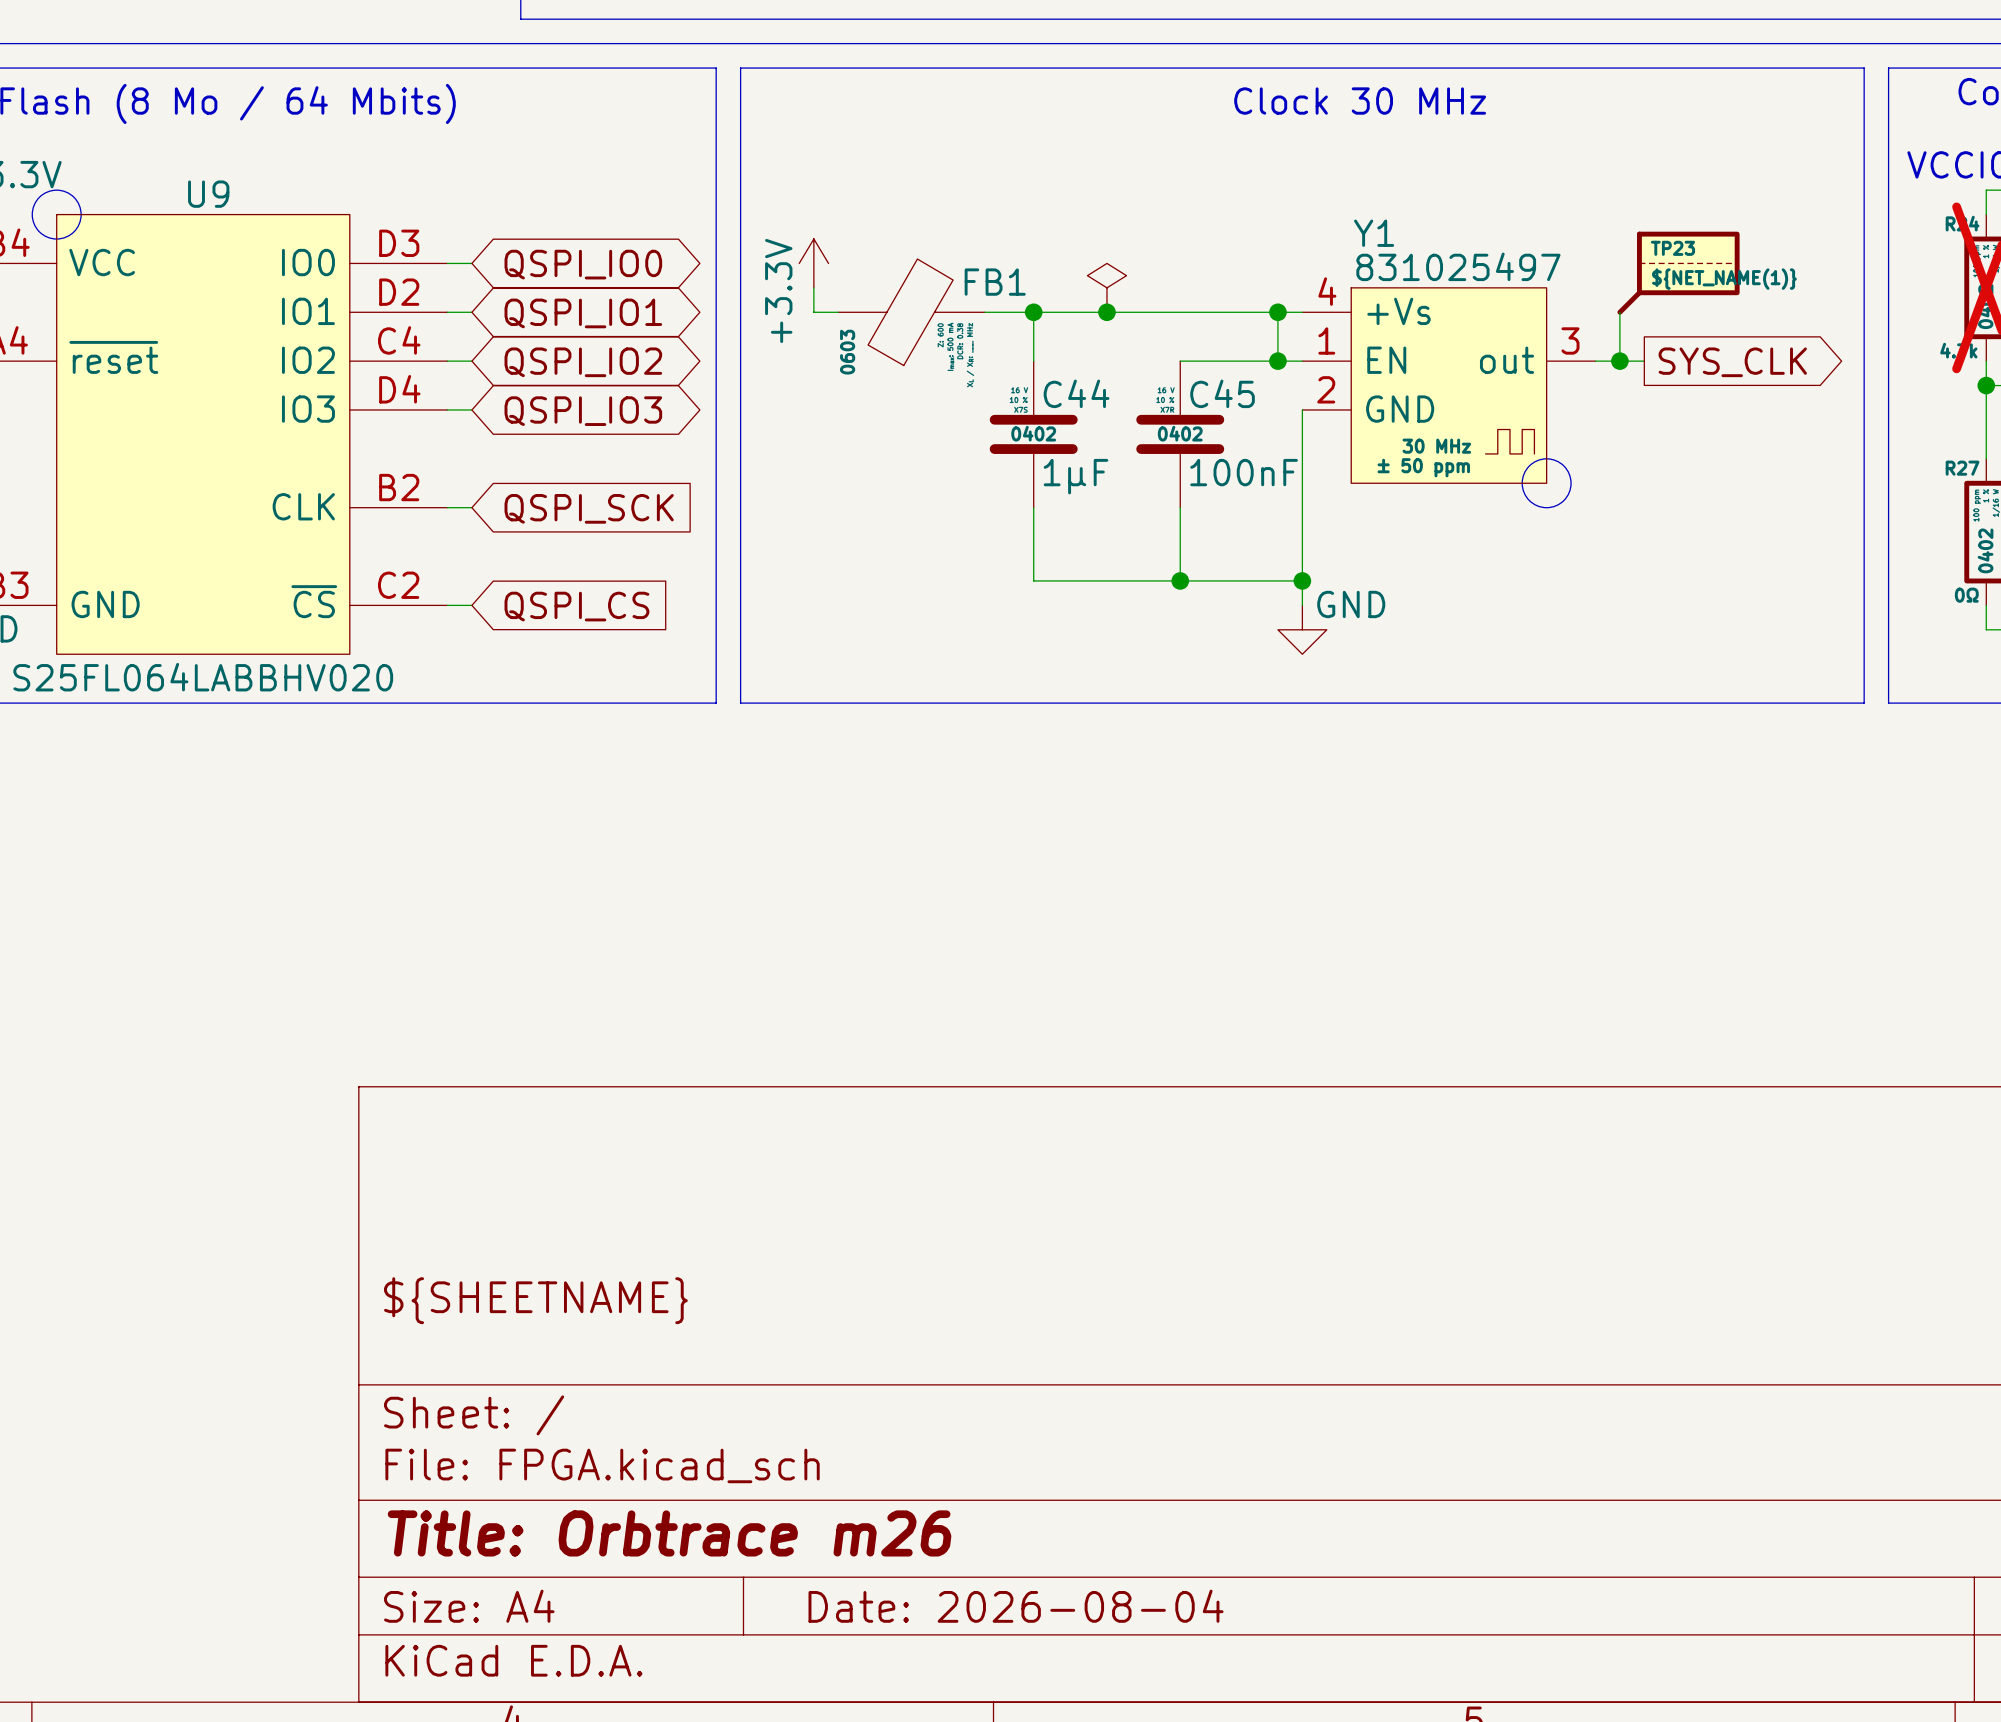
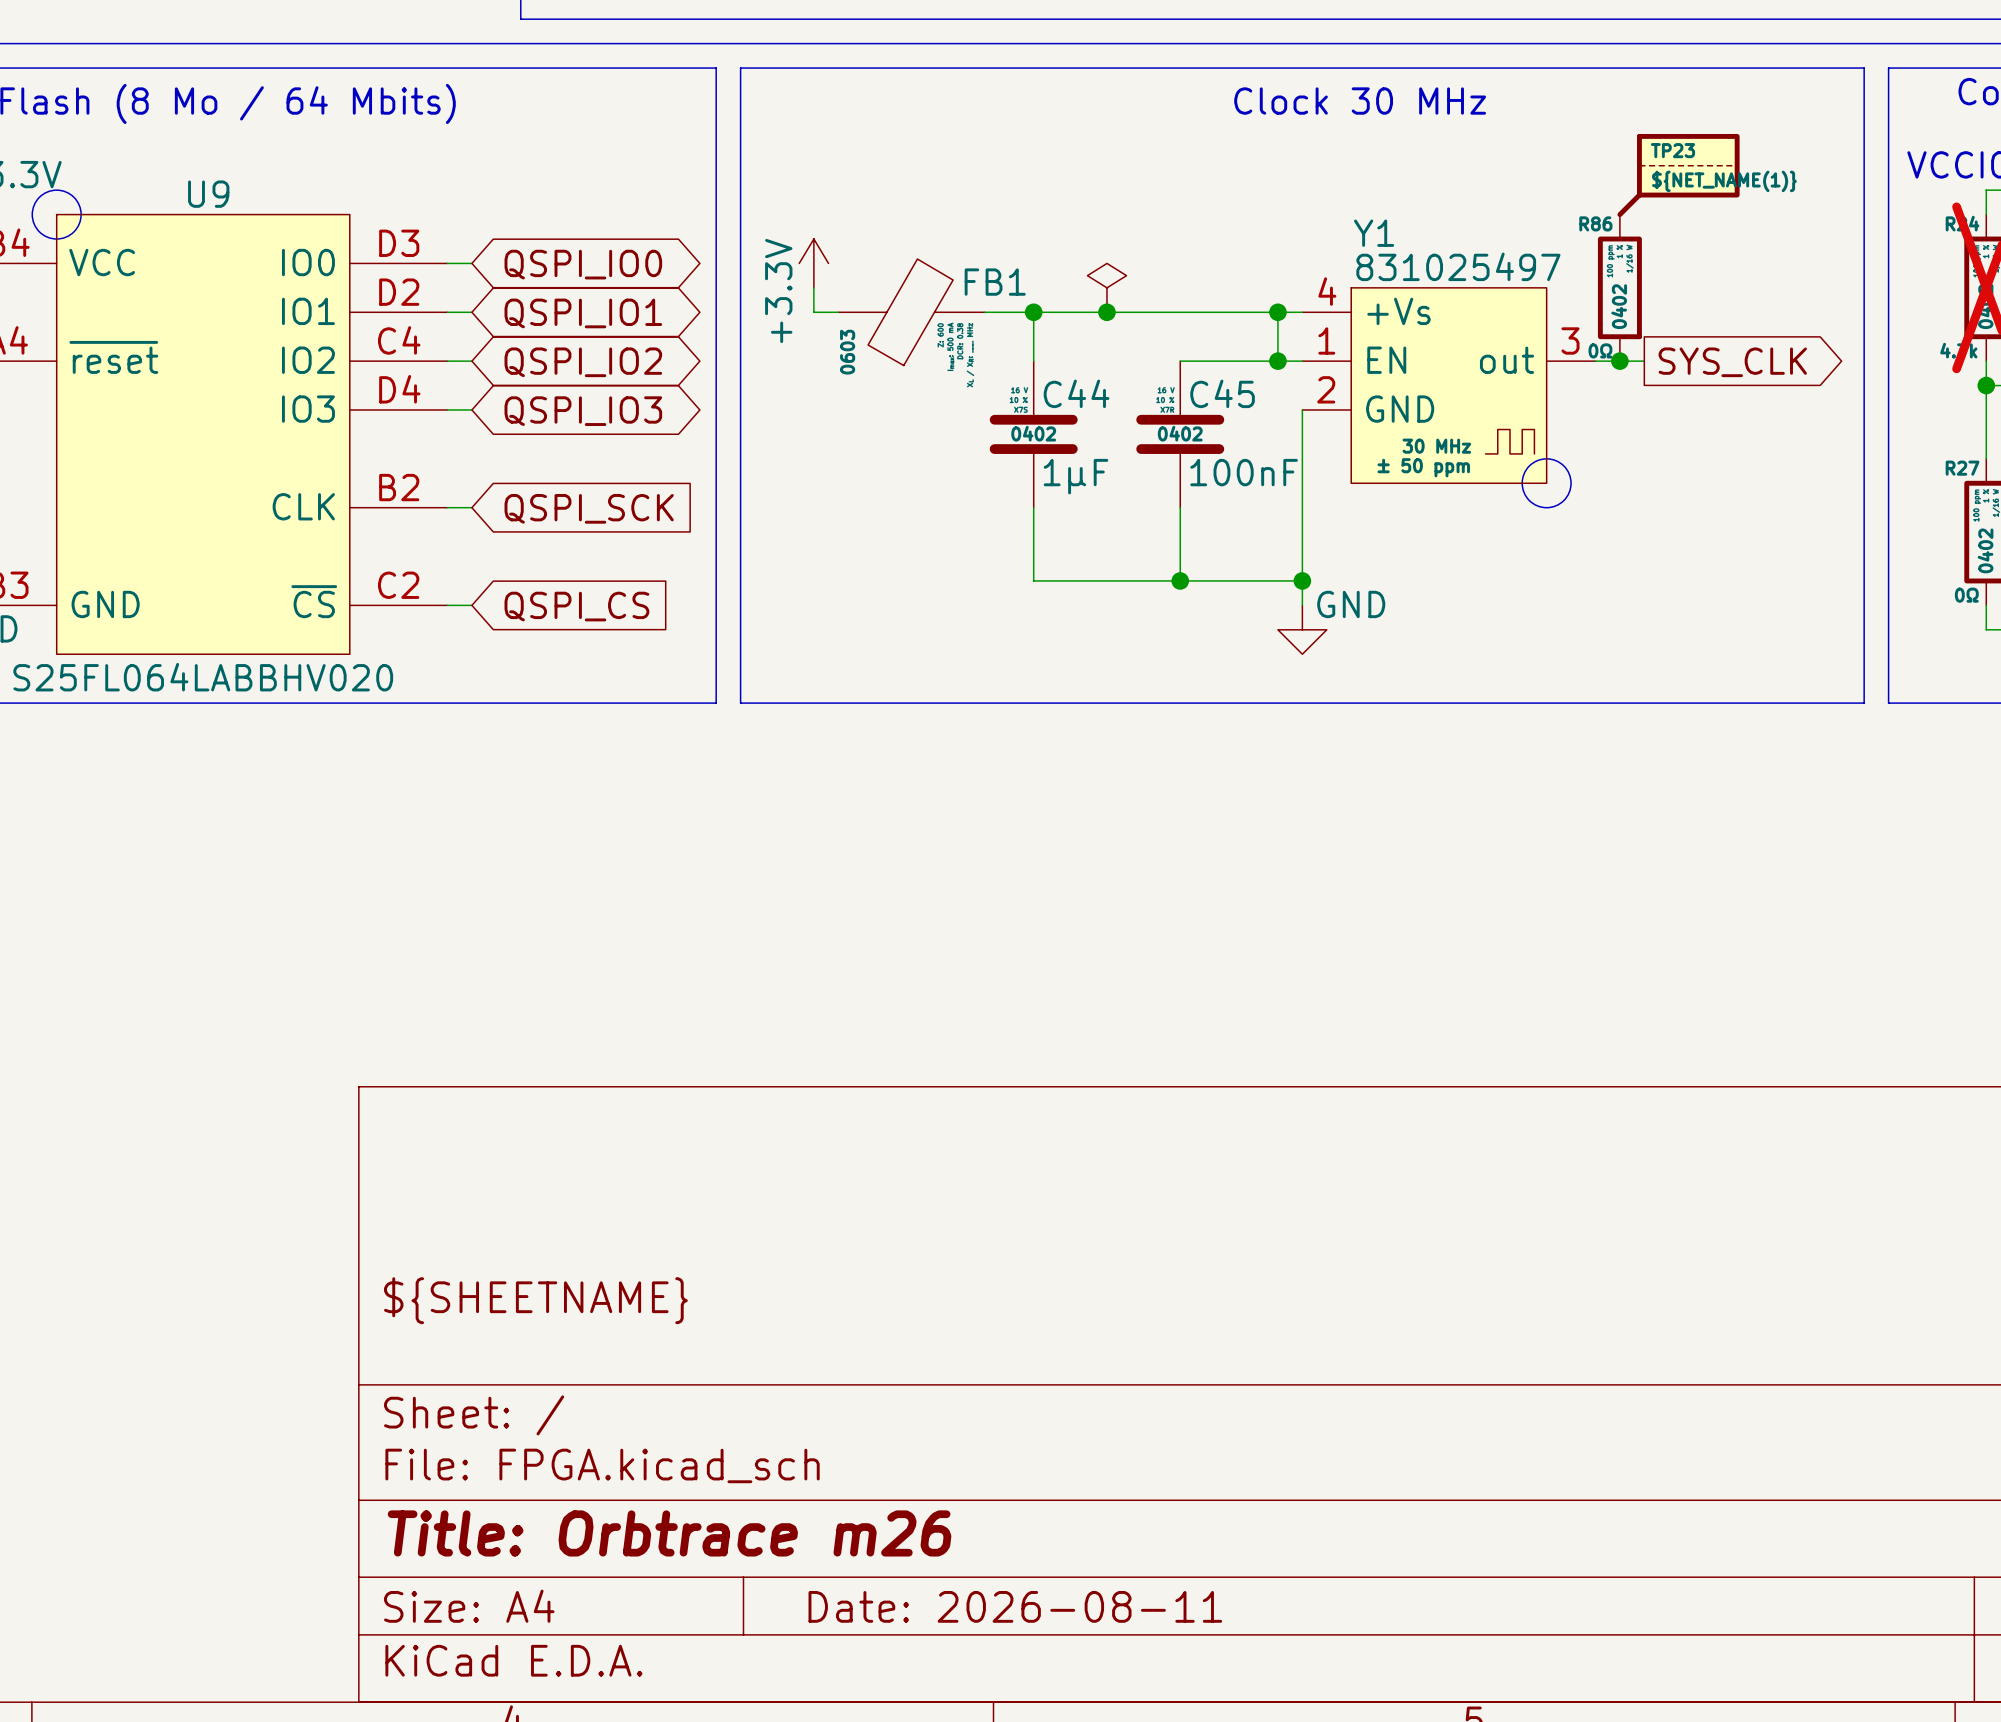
TP23 position: (1678, 273) -> (1678, 175)
R86: none -> 0Ω (1619, 287)
title block: Date: 2026-08-04 (1016, 1606) -> Date: 2026-08-11 (1015, 1606)

